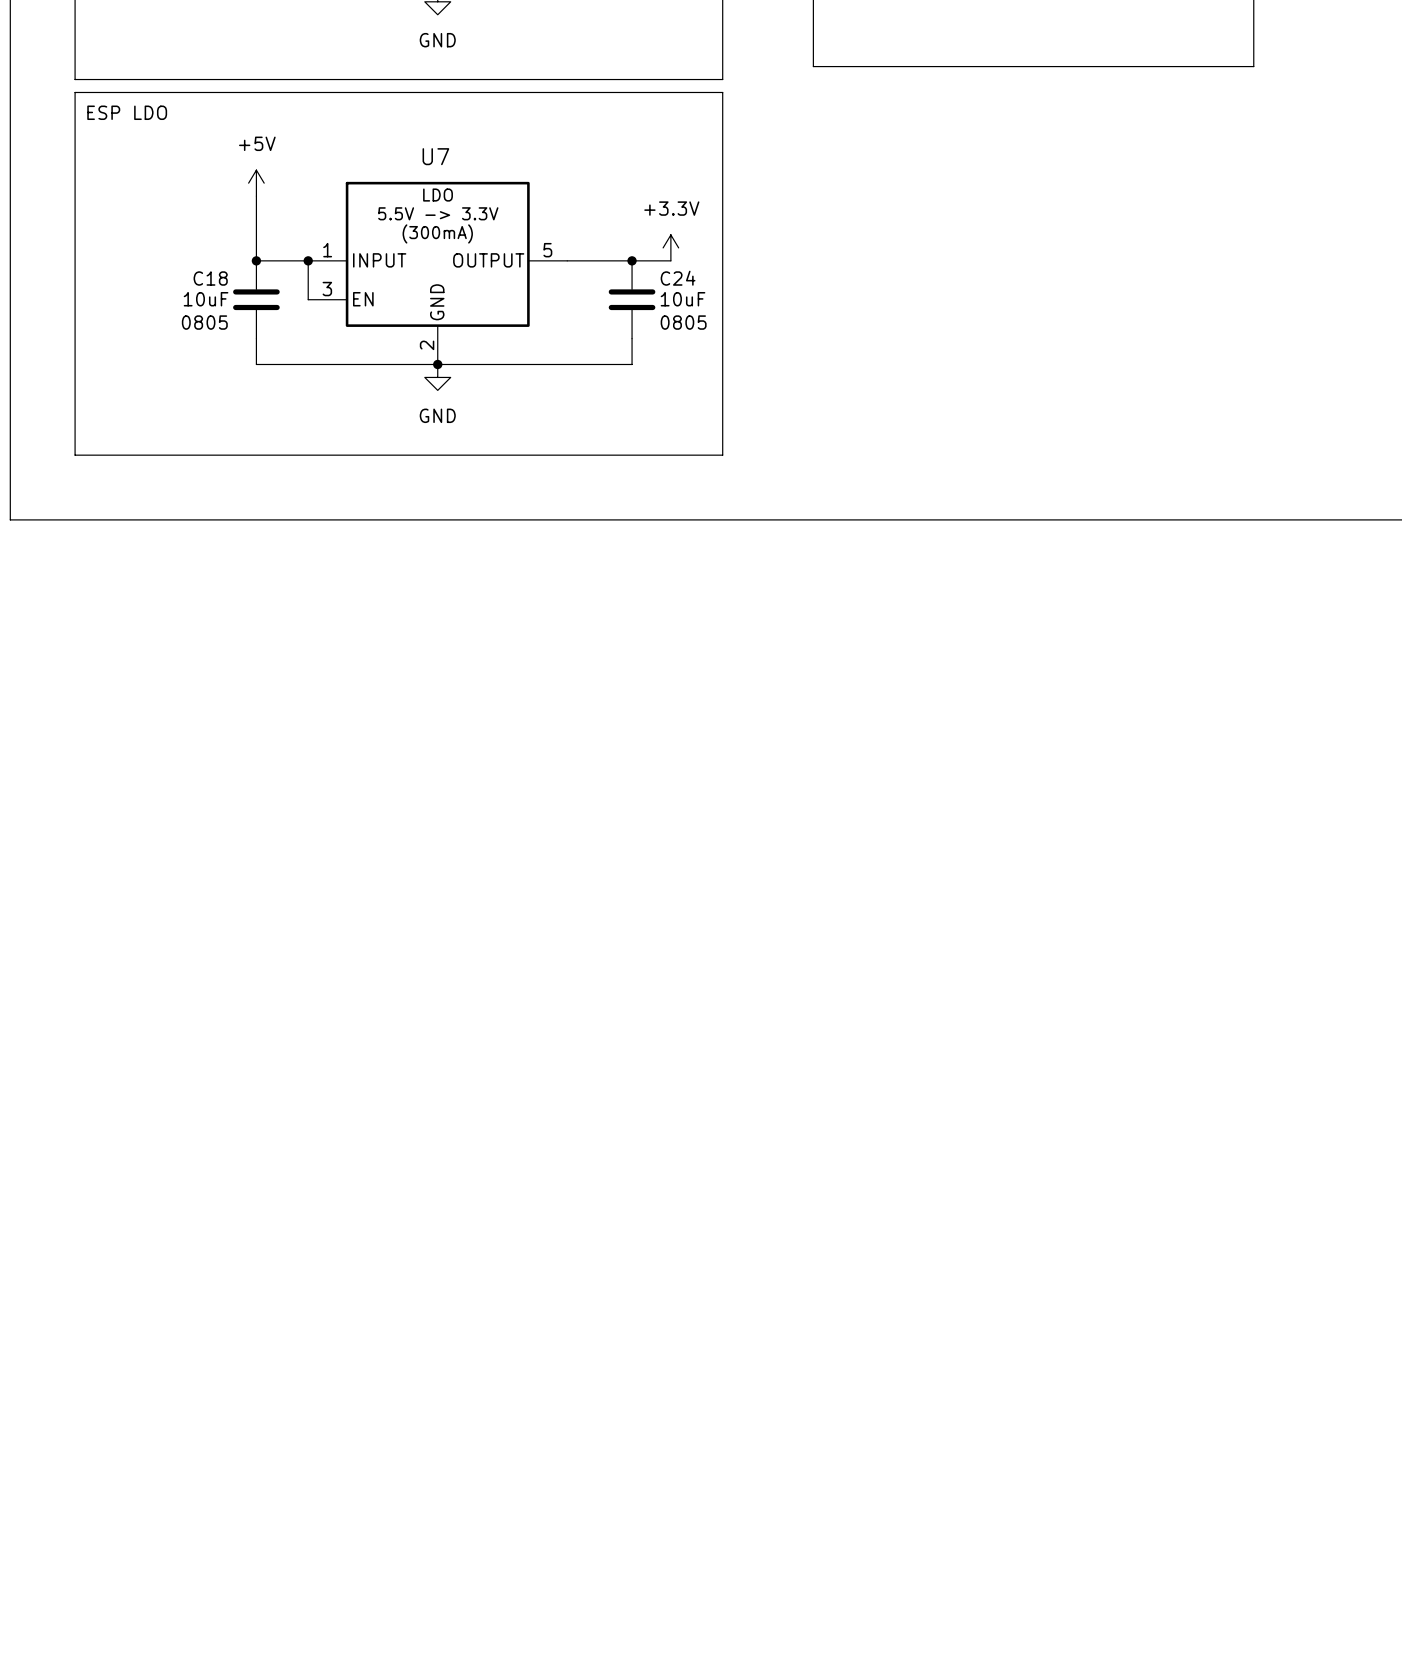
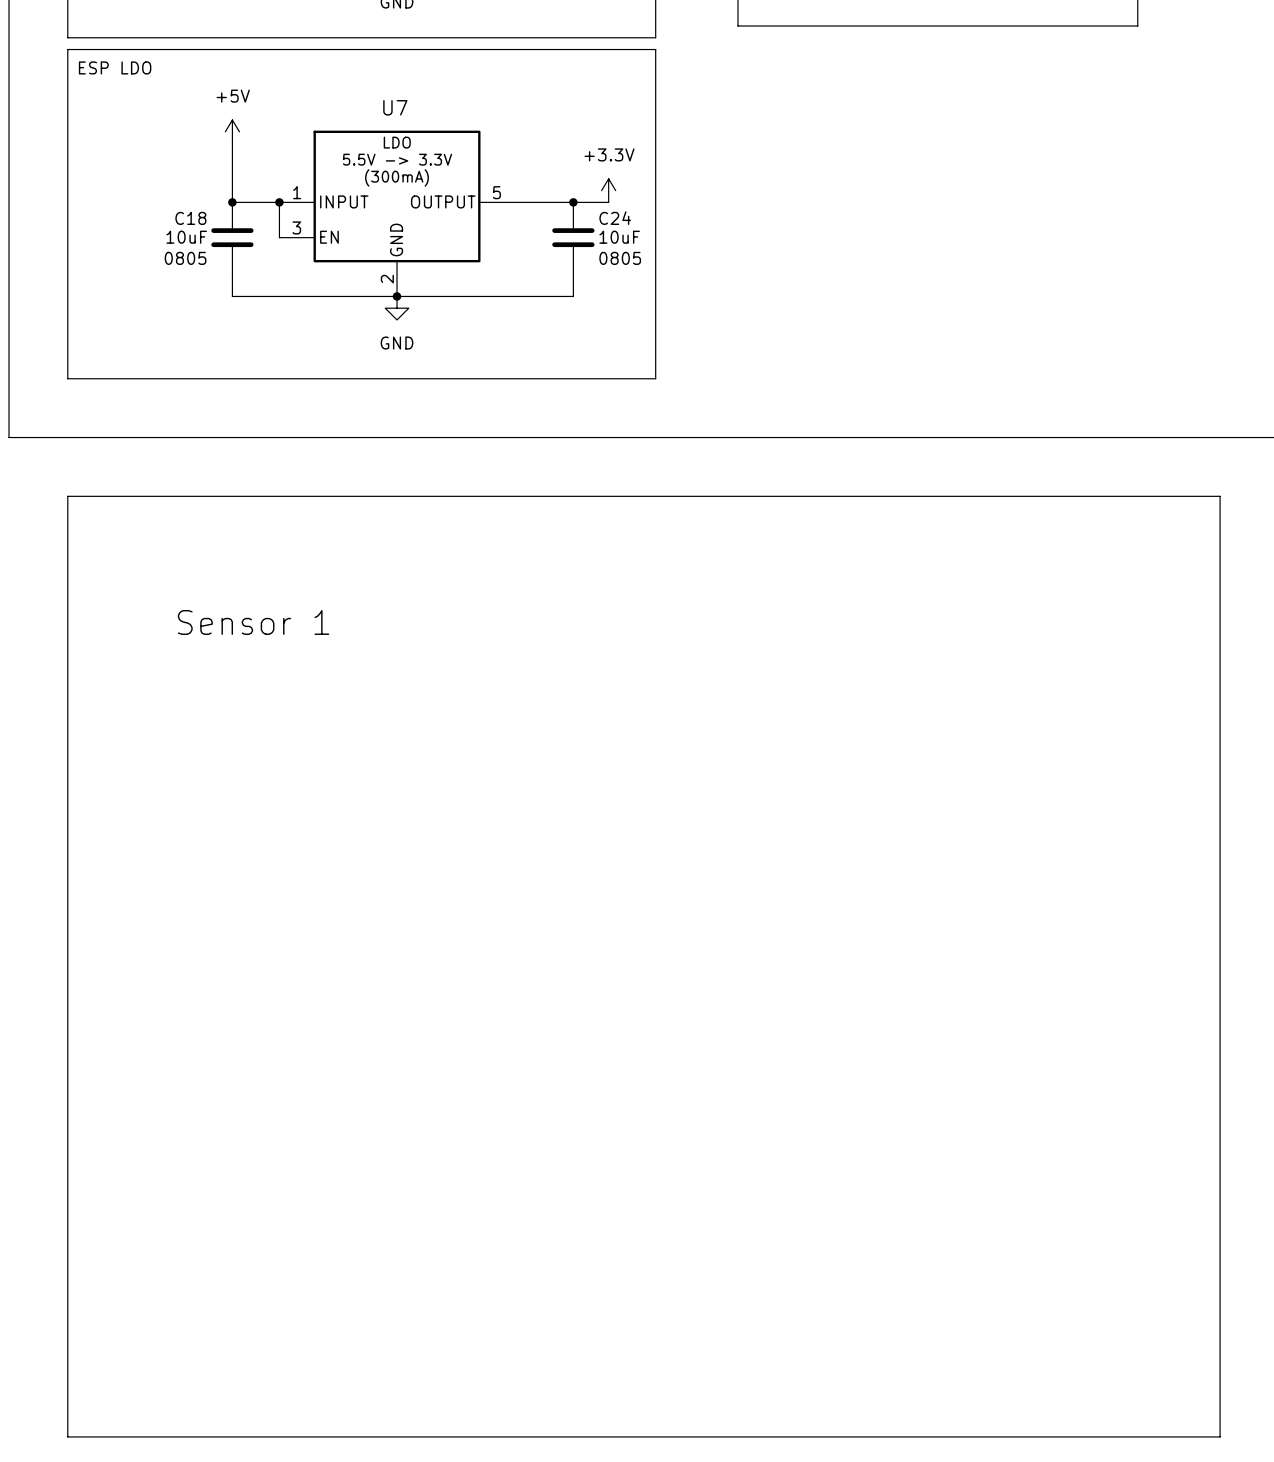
line: none -> (67, 496) (1220, 496) (1220, 1436) (67, 1436) (67, 496)
text: none -> Sensor 1 (253, 622)

